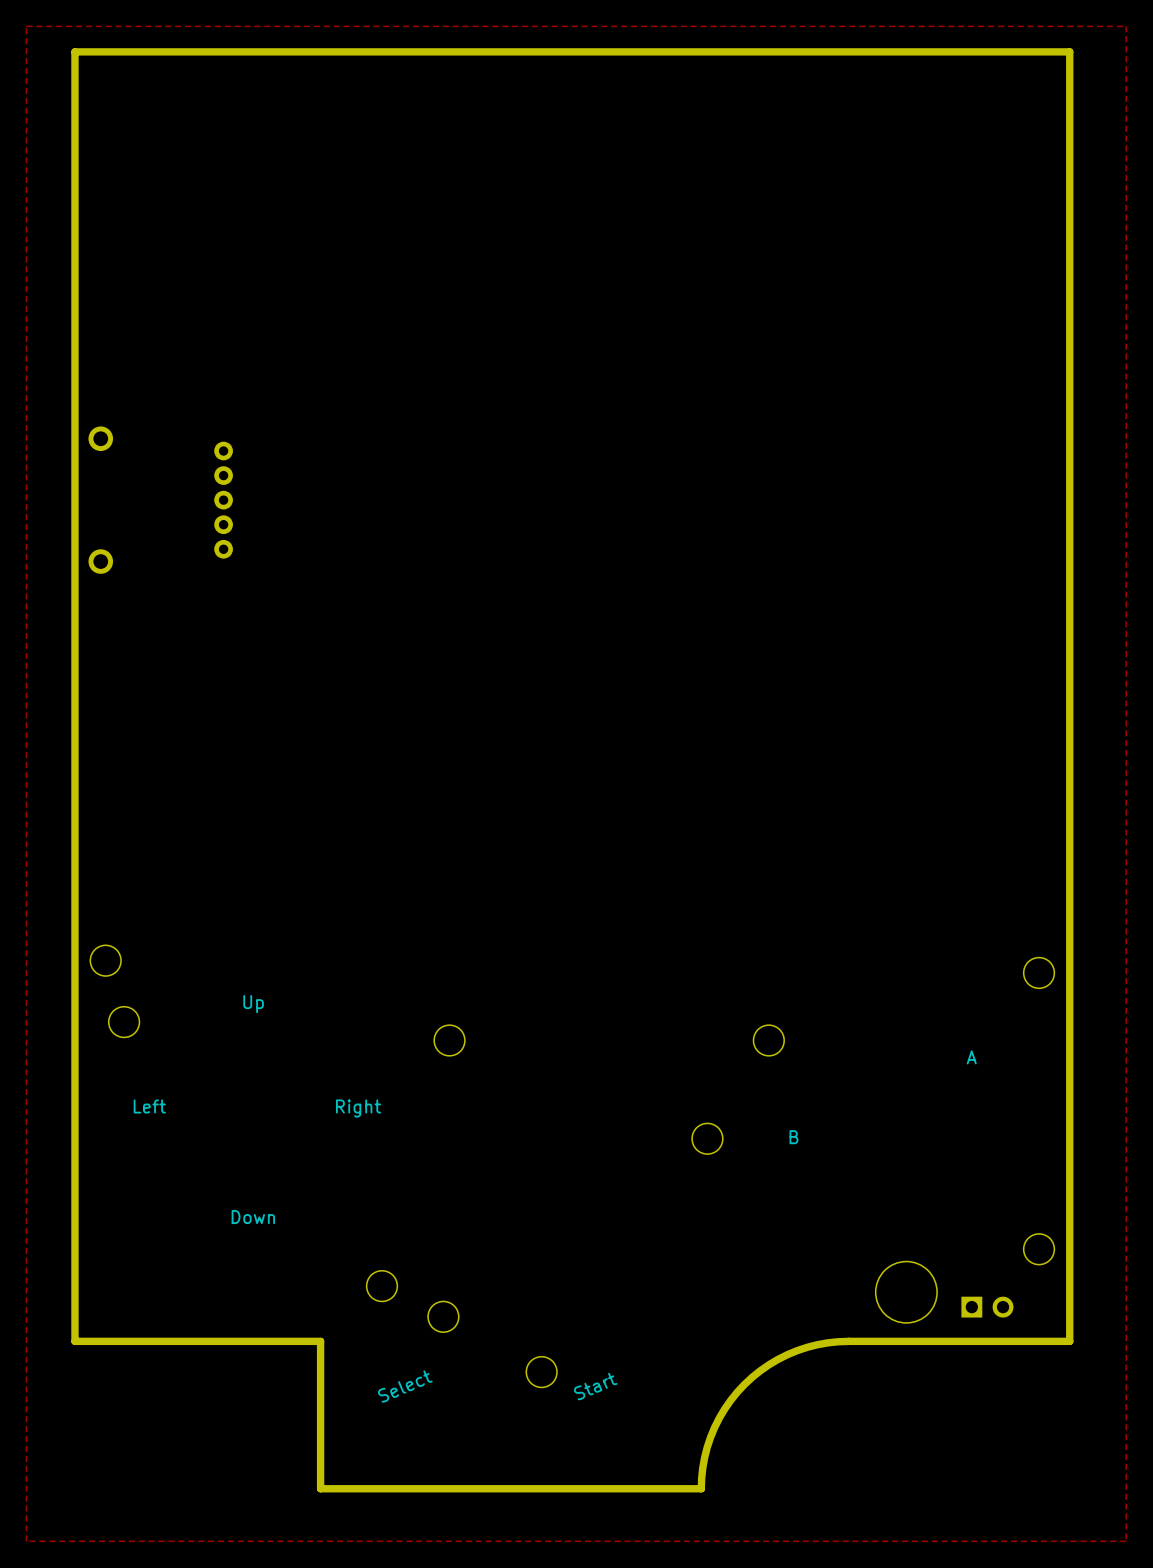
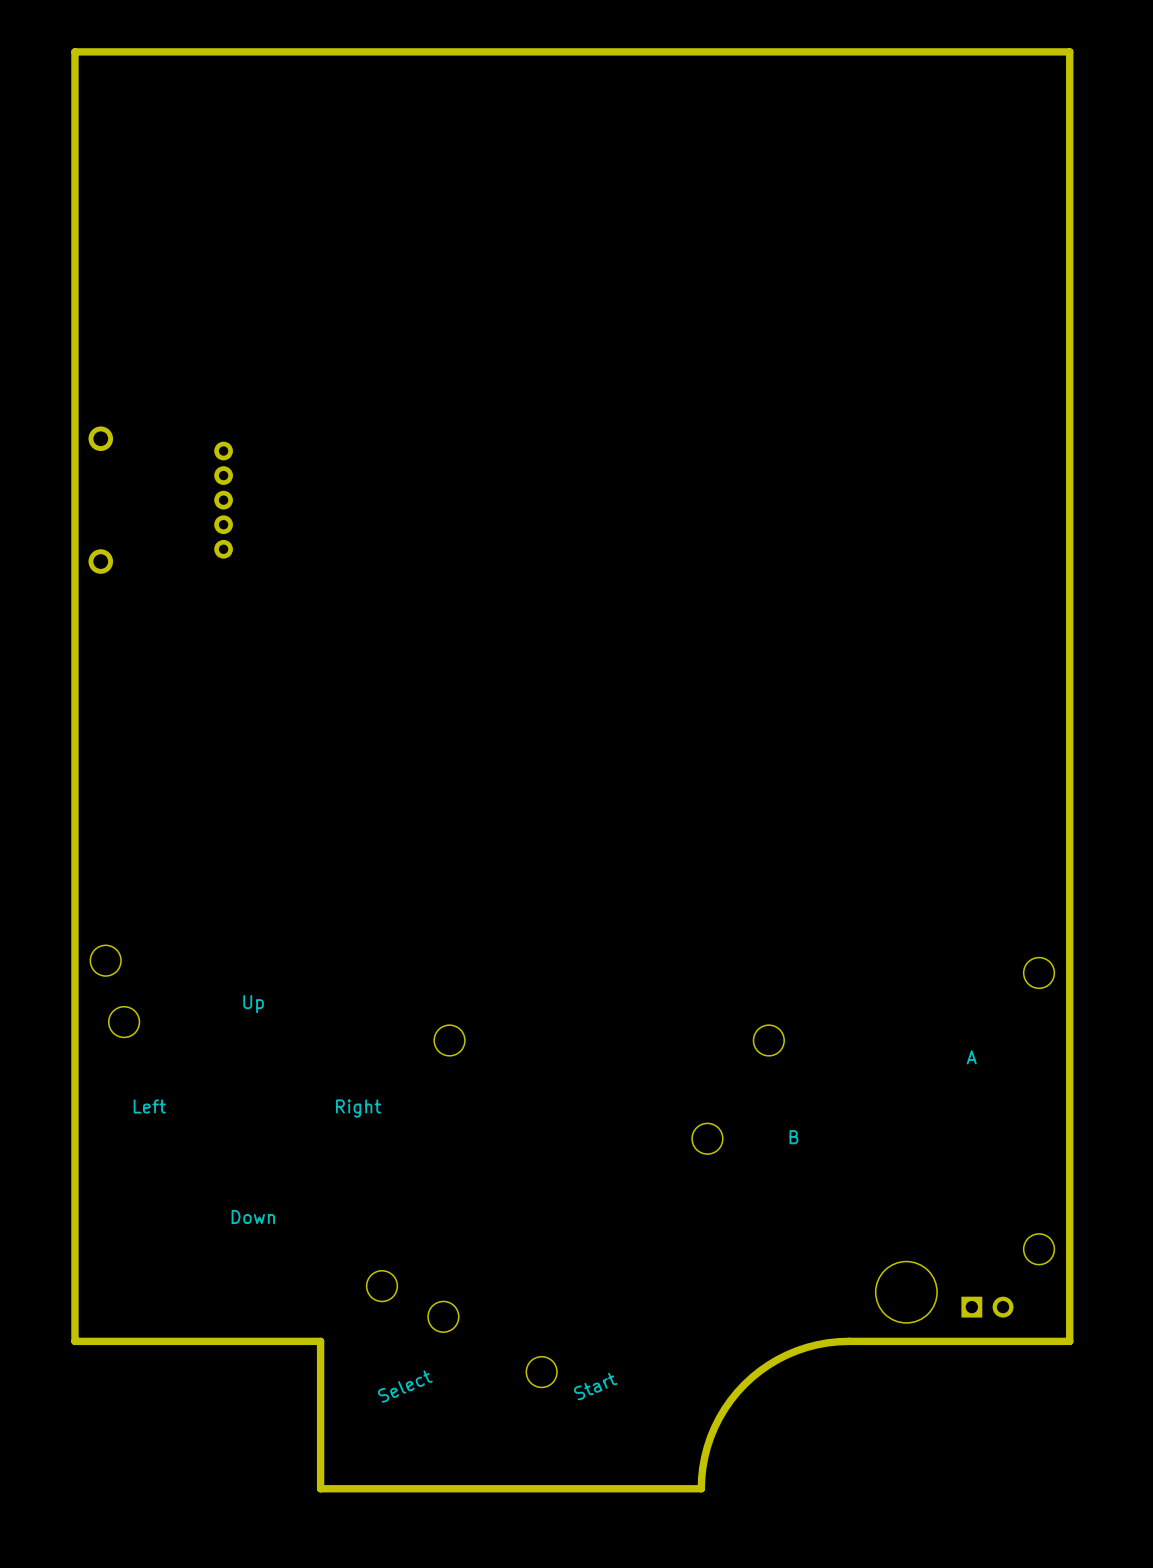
zone outline: (26, 26) (26, 1541) (1126, 1541) (1126, 26) (26, 26) -> none

